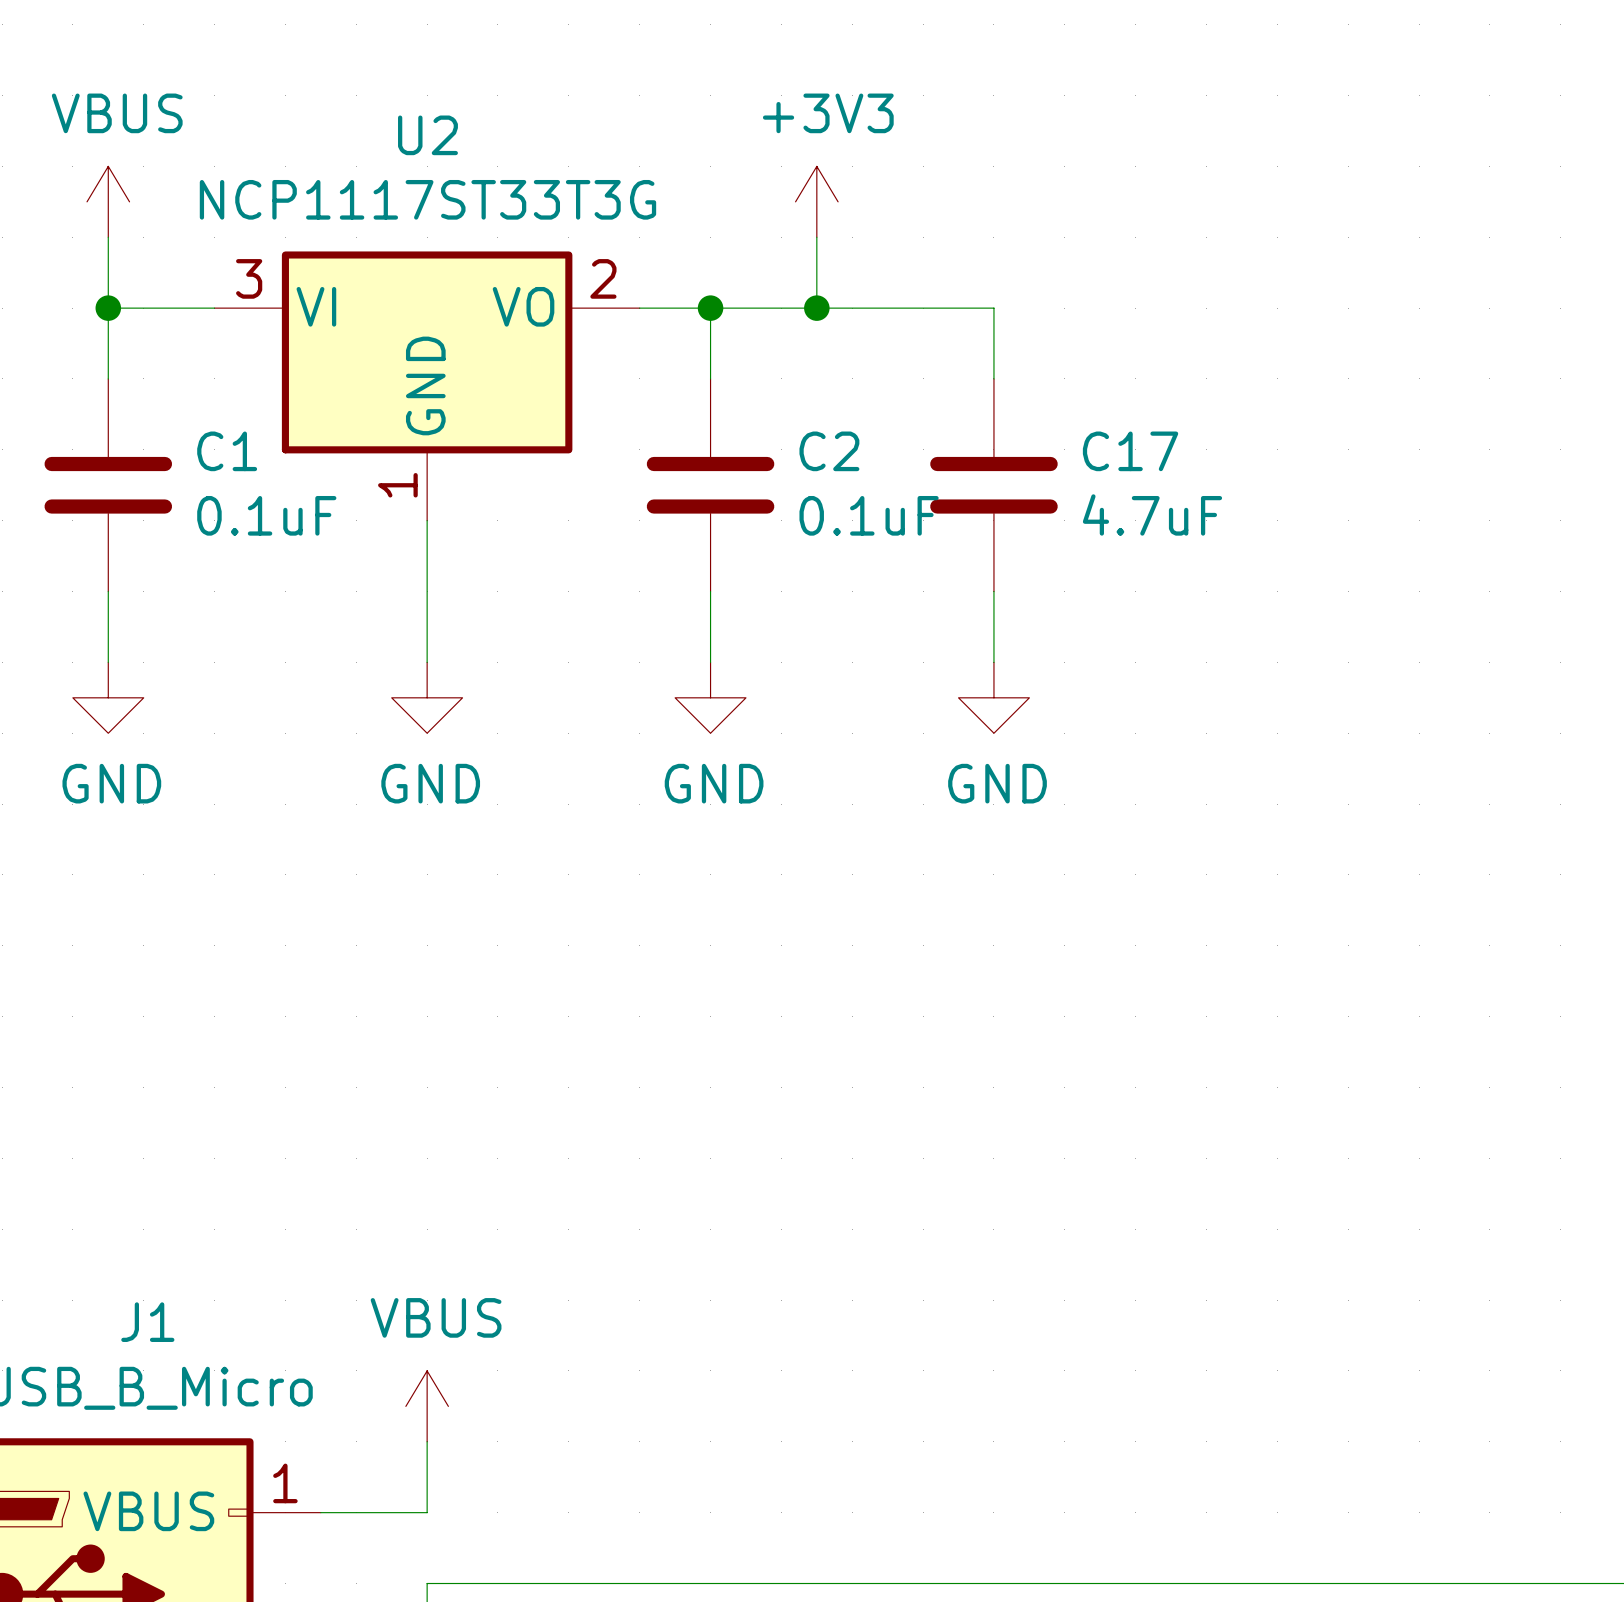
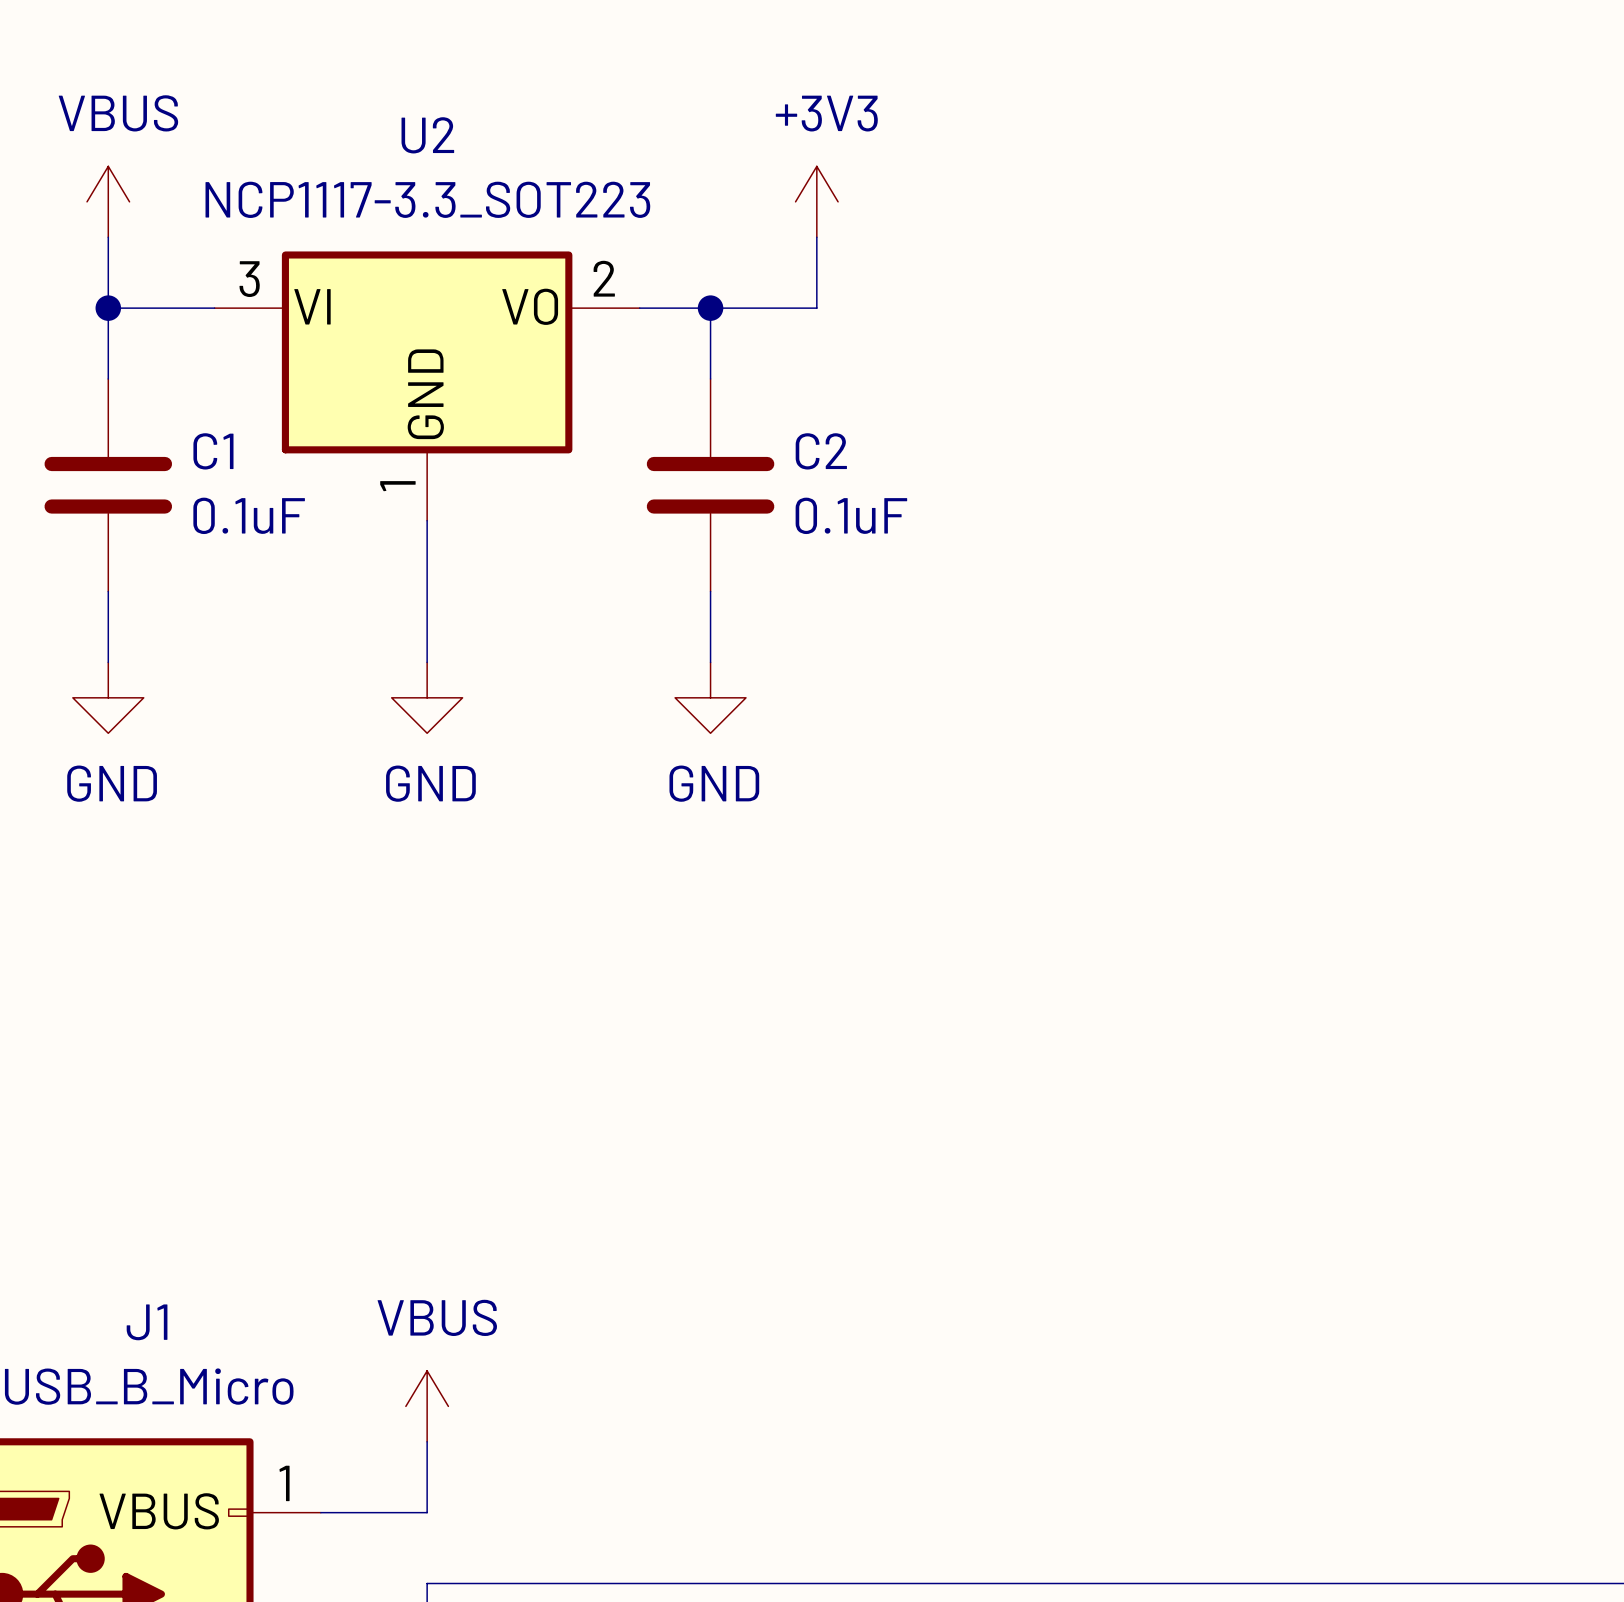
U2 value: NCP1117ST33T3G (427, 199) -> NCP1117-3.3_SOT223 (427, 199)
wire: (816, 308) (993, 308) (993, 378) -> none
junction: (816, 308) -> none
C17: 4.7uF (993, 485) -> none
wire: (993, 591) (993, 662) -> none
power symbol: GND (993, 697) -> none

